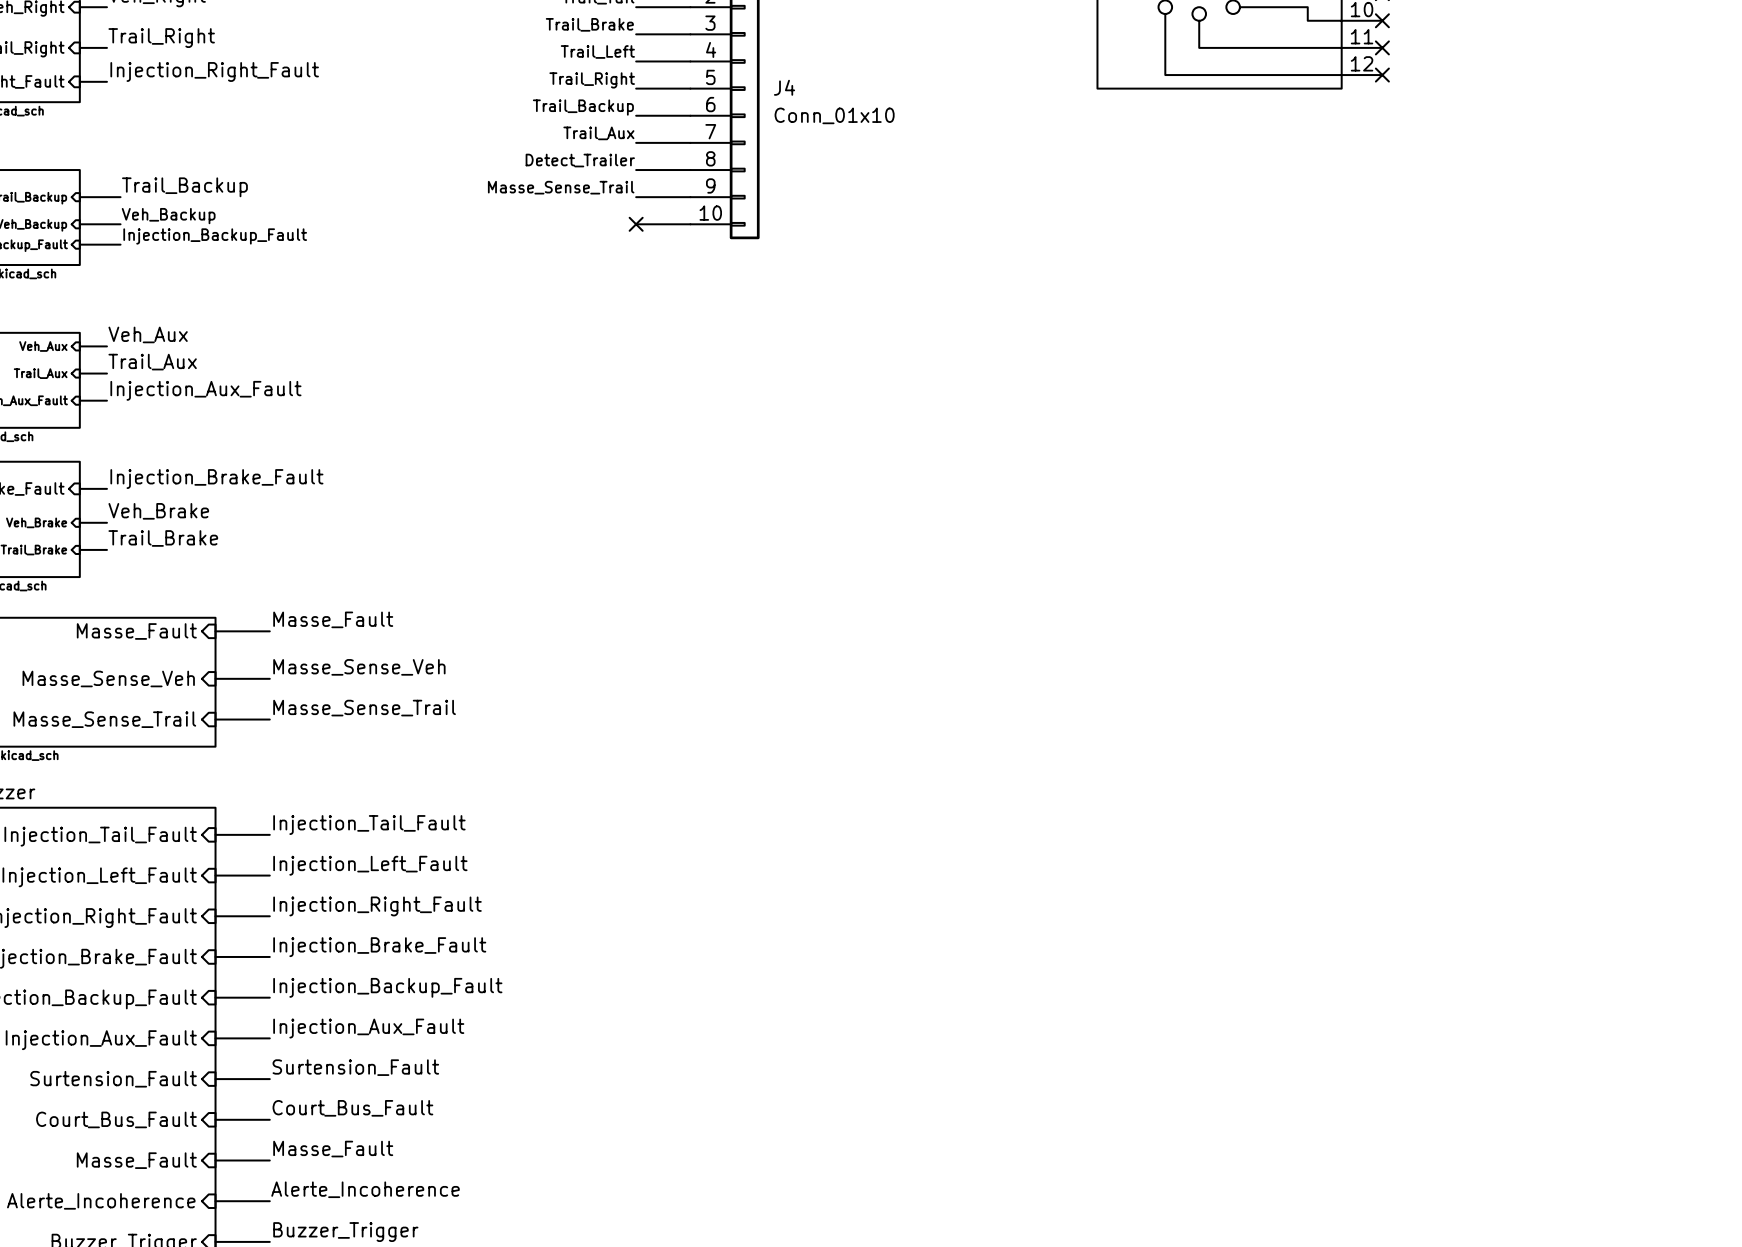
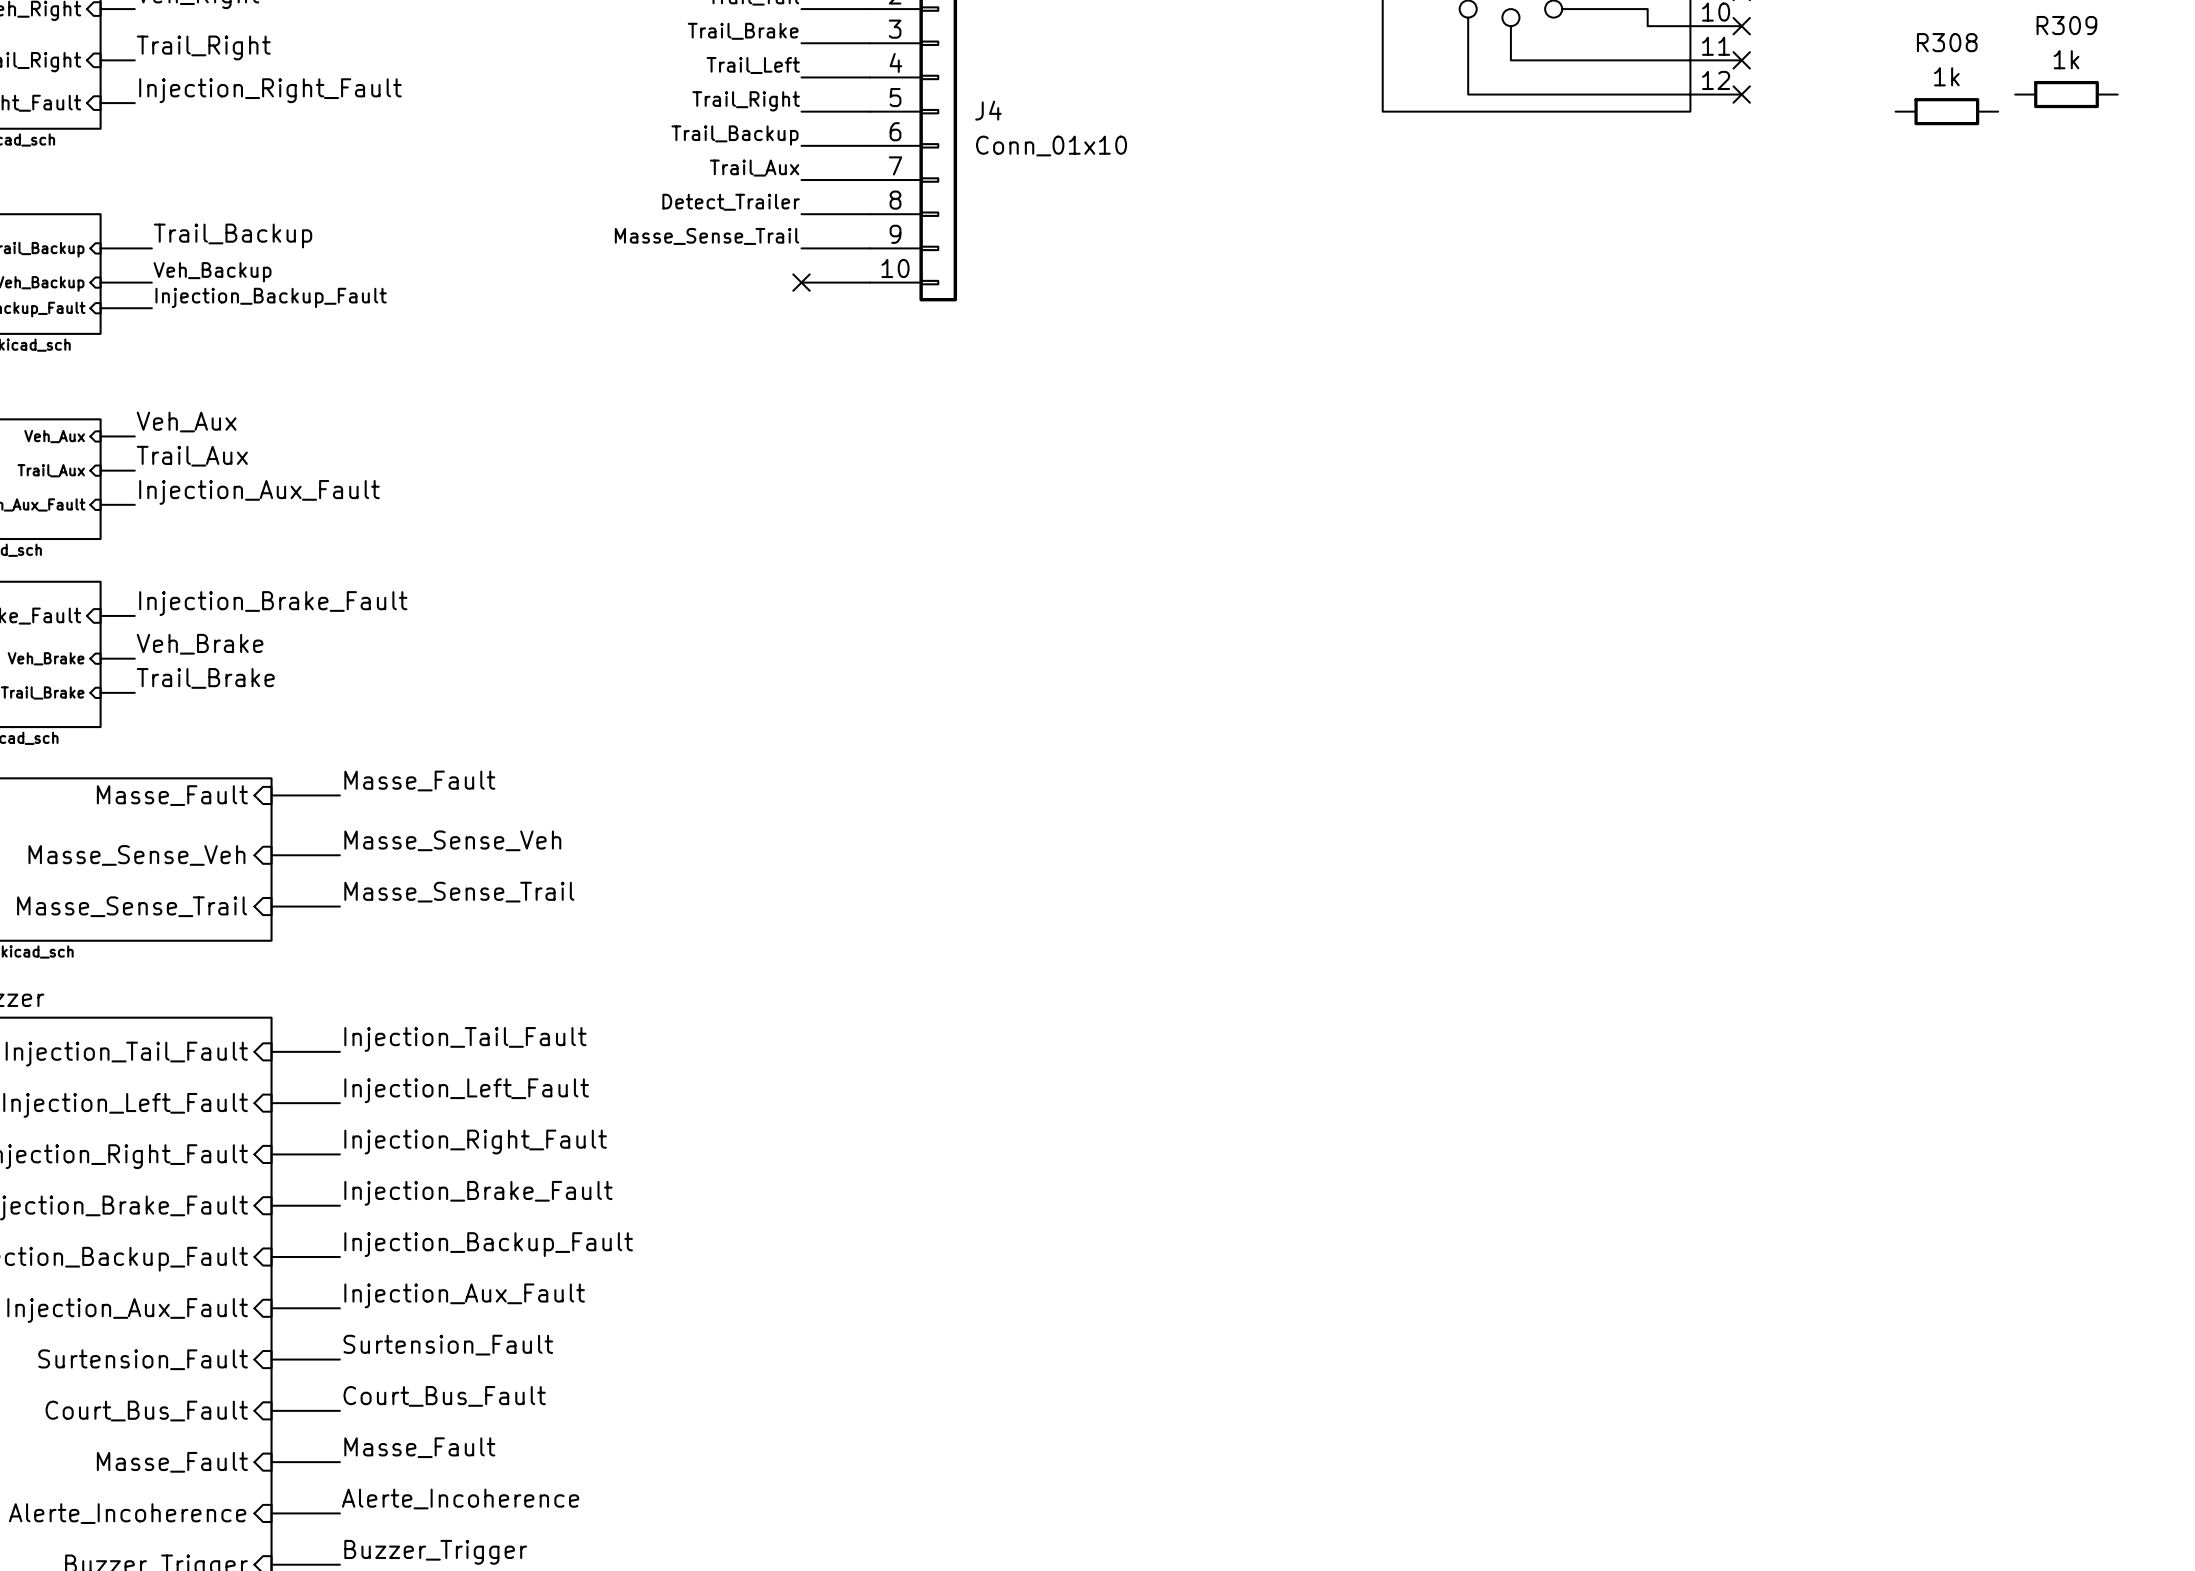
R309: none -> 1k (2066, 94)
R308: none -> 1k (1946, 111)

